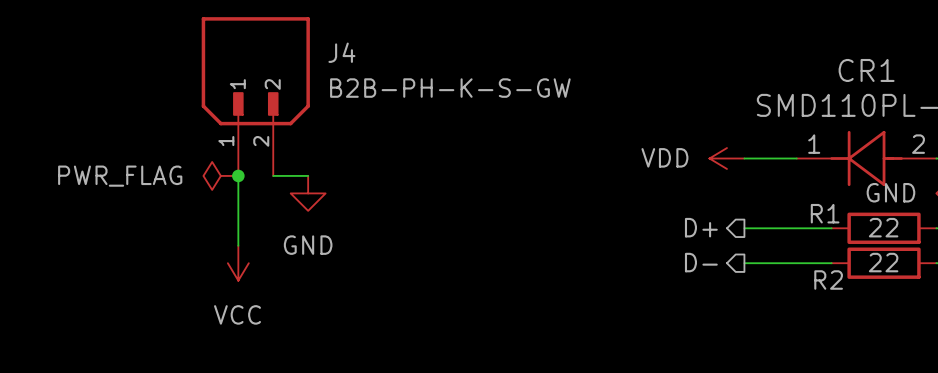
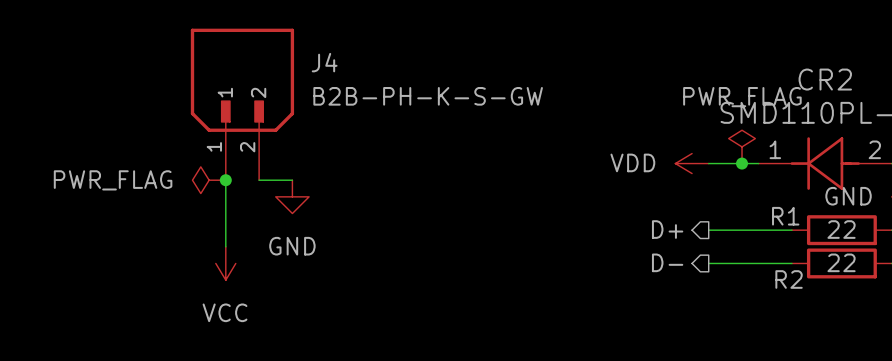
CR1 name: CR1 (866, 70) -> CR2 (825, 79)
power symbol: none -> PWR_FLAG (742, 146)
junction: none -> (742, 163)

